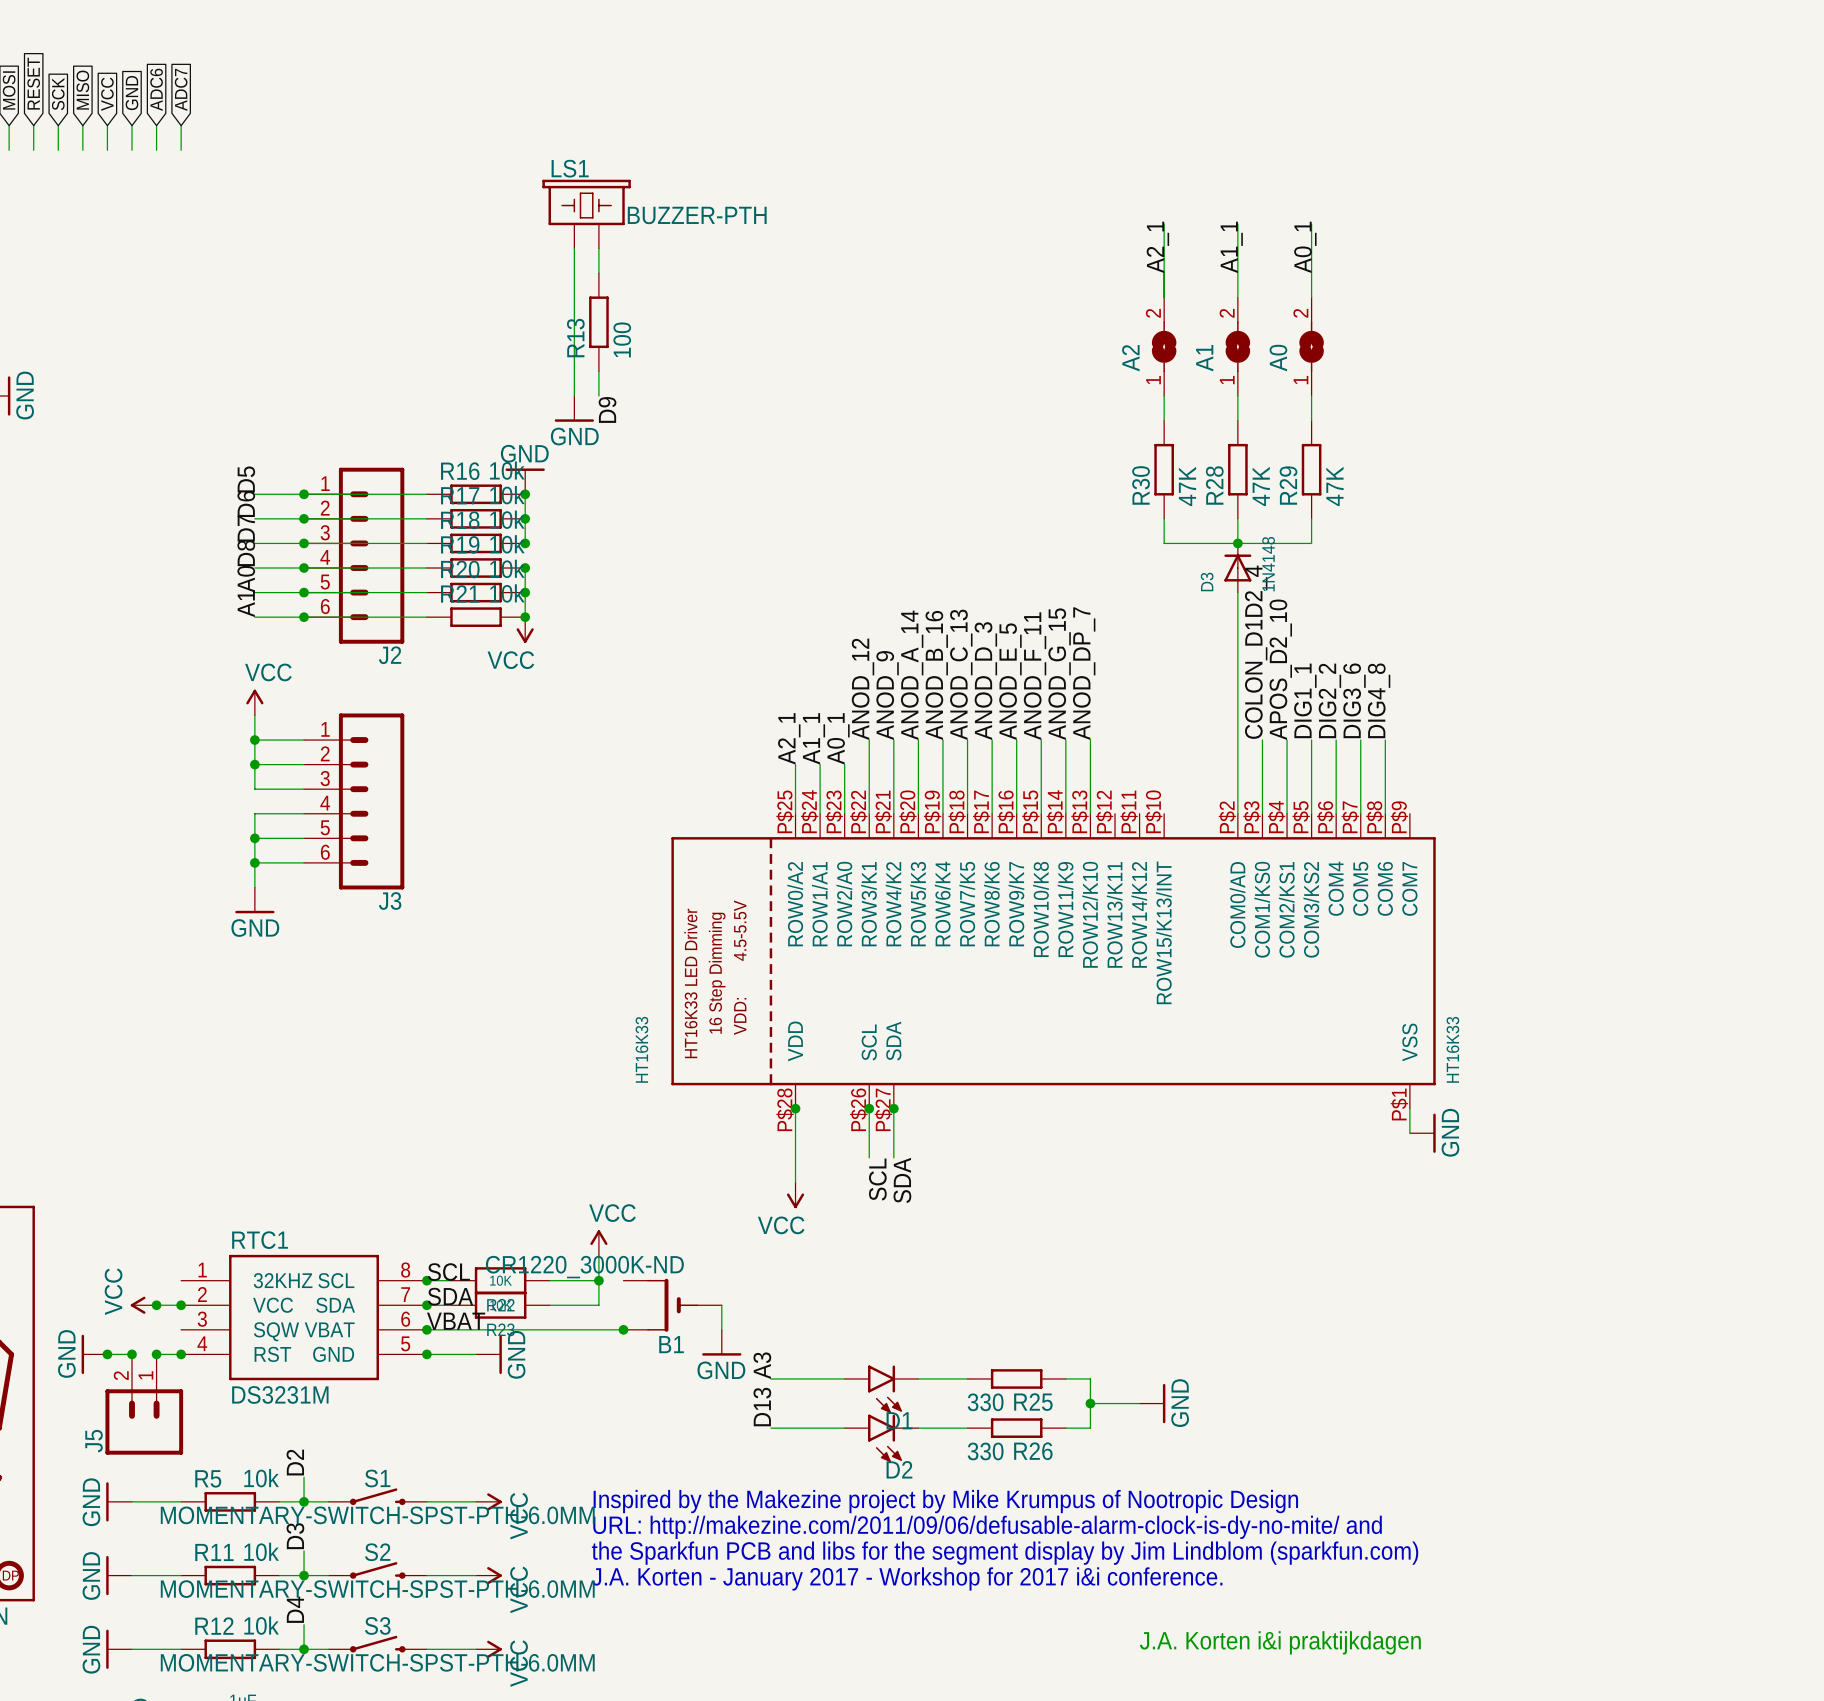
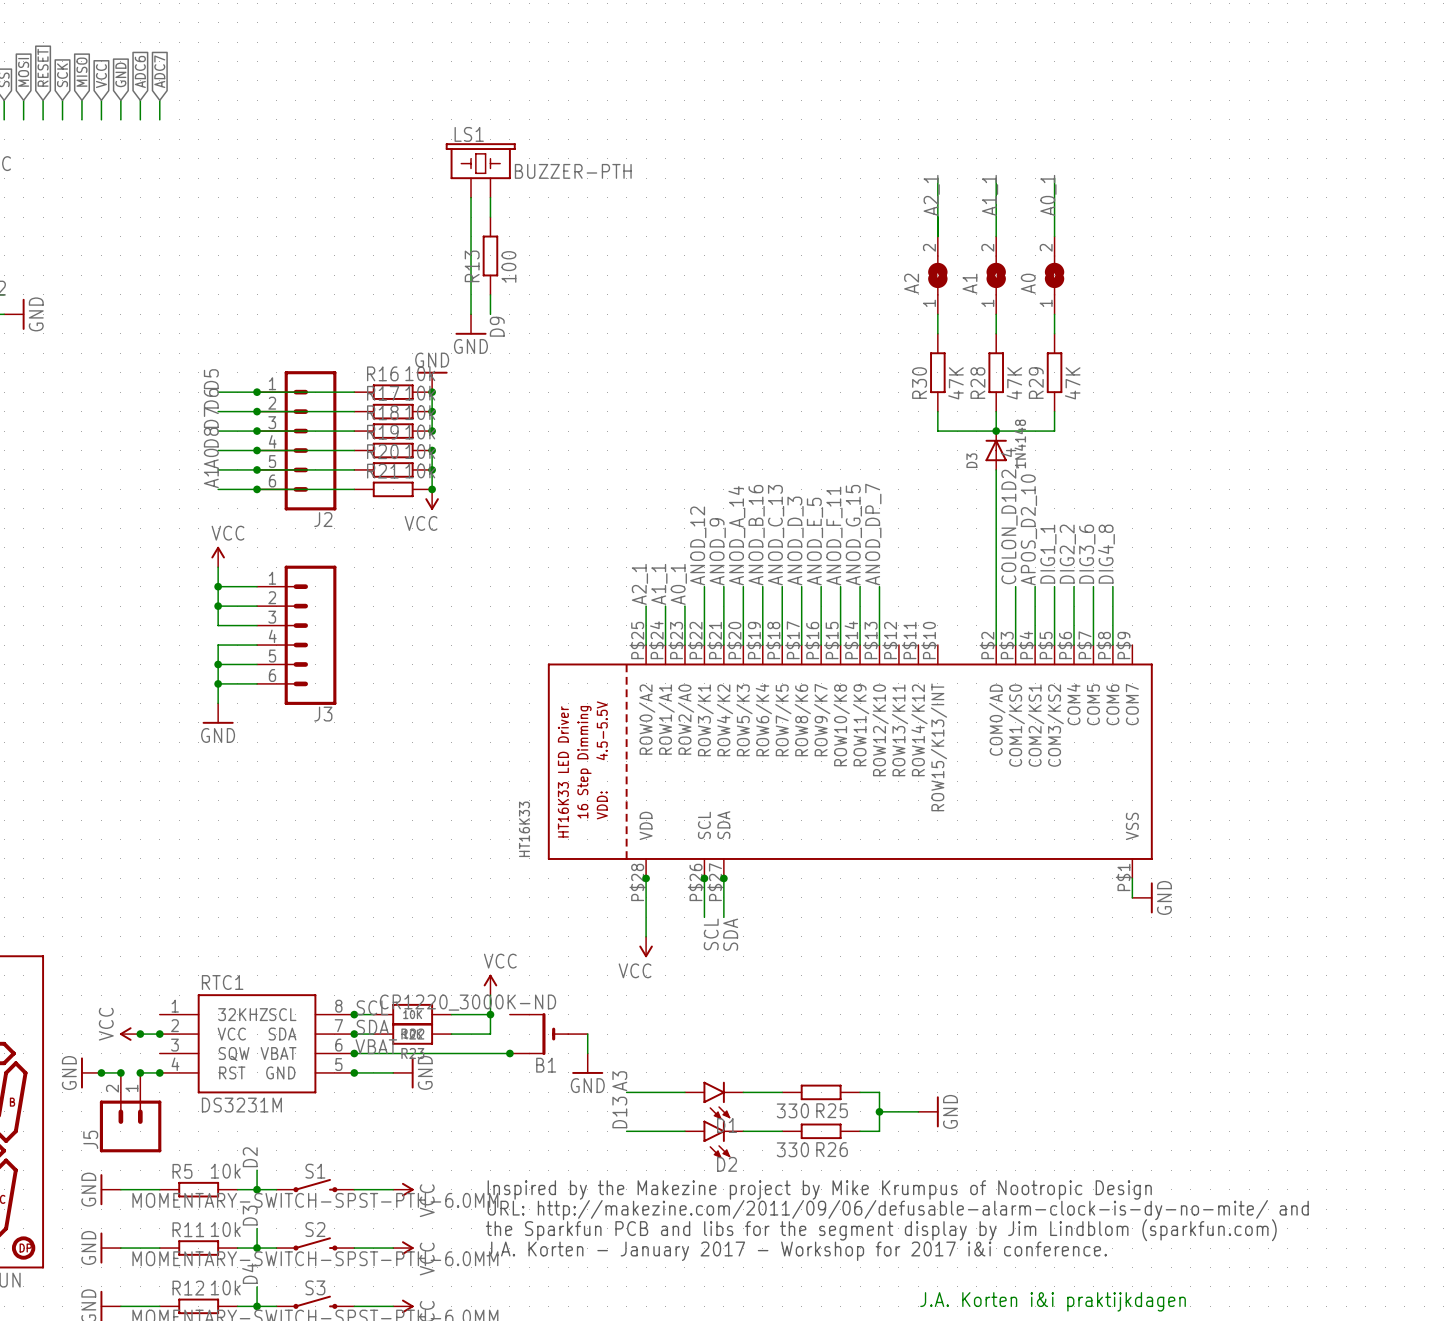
HT16K33 value: HT16K33 (1452, 1049) -> none

